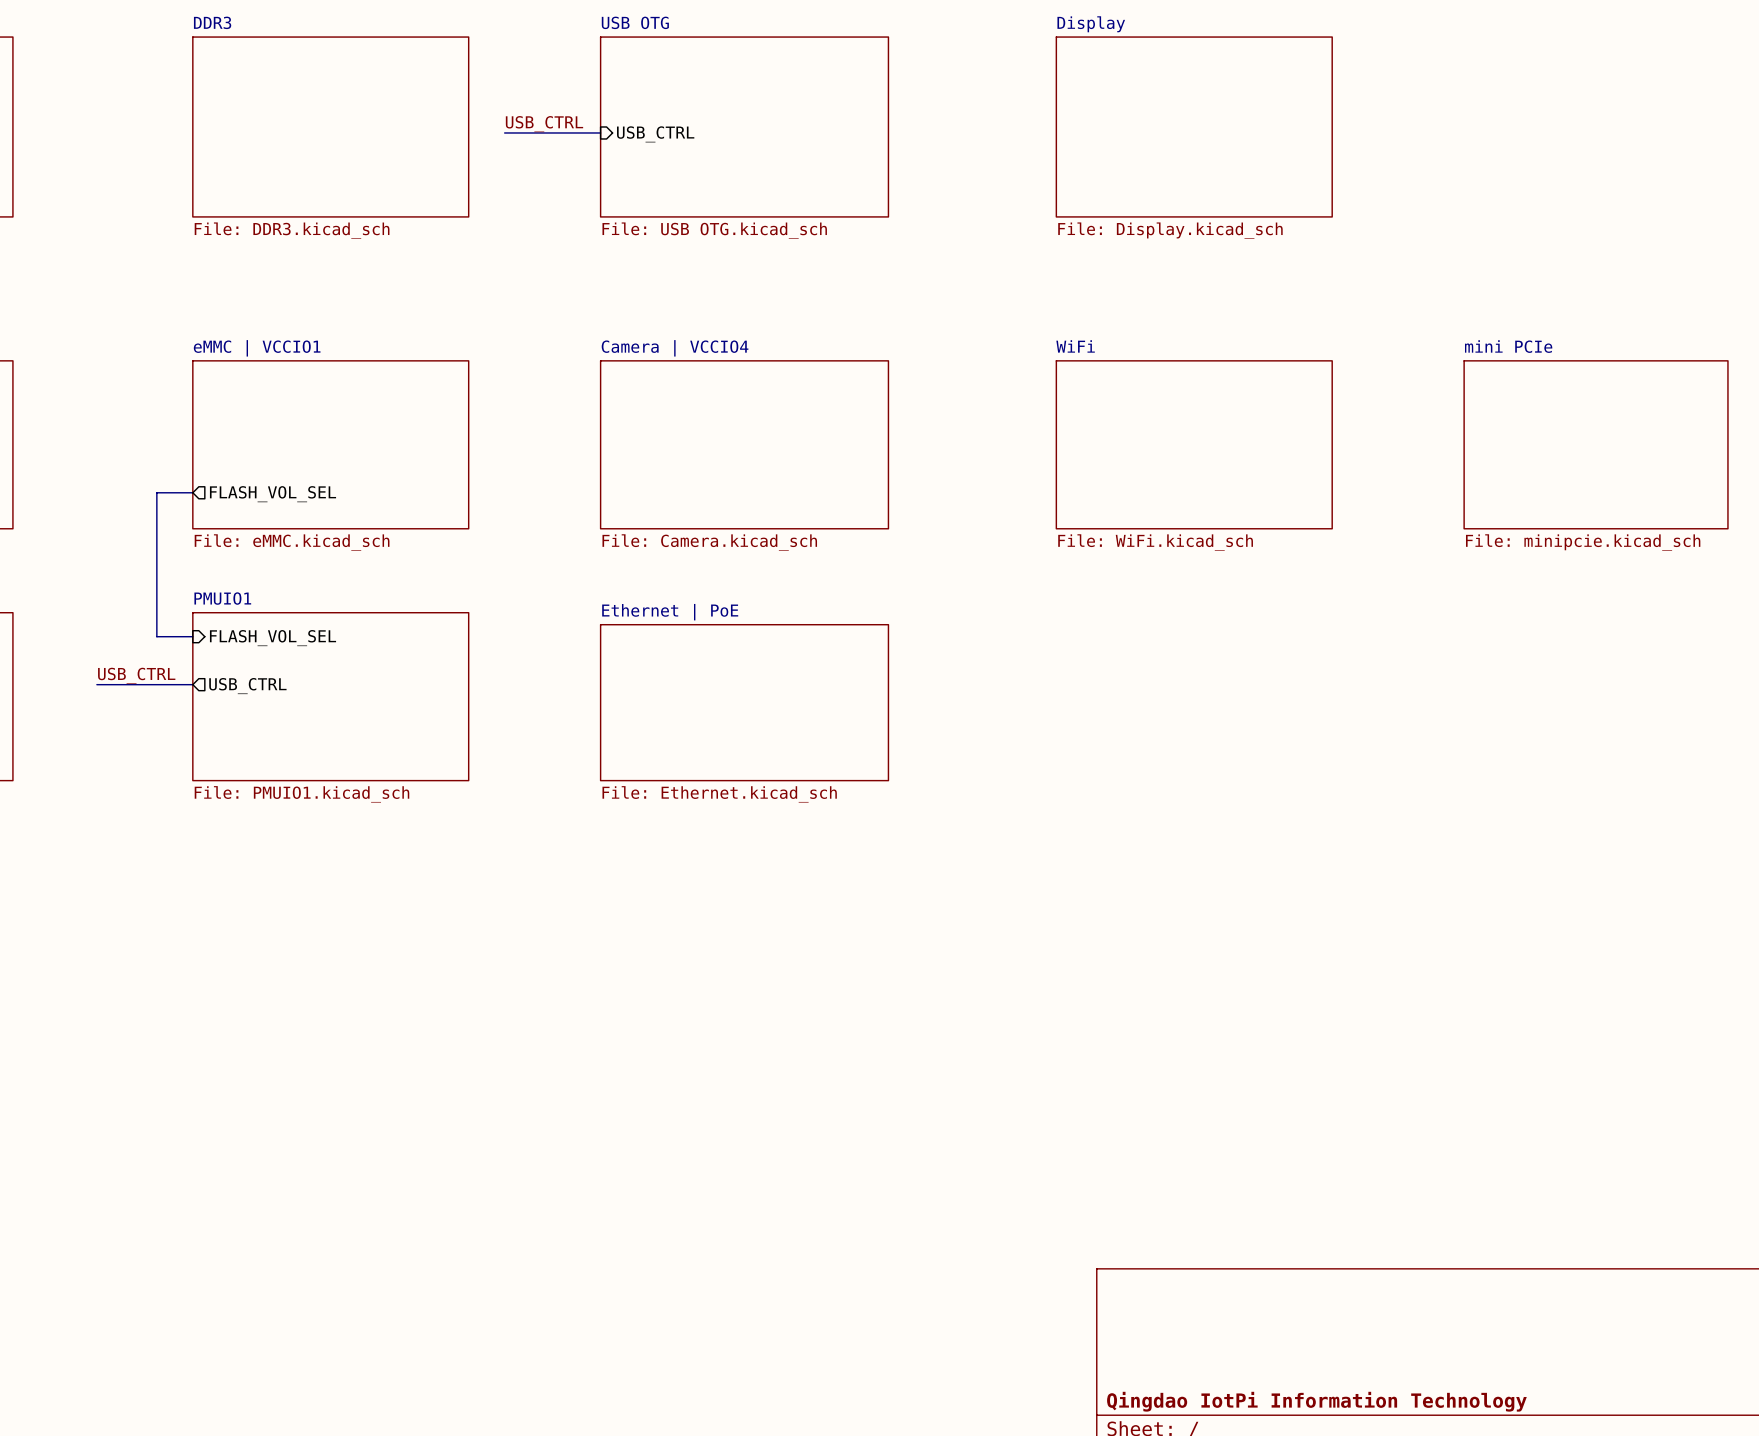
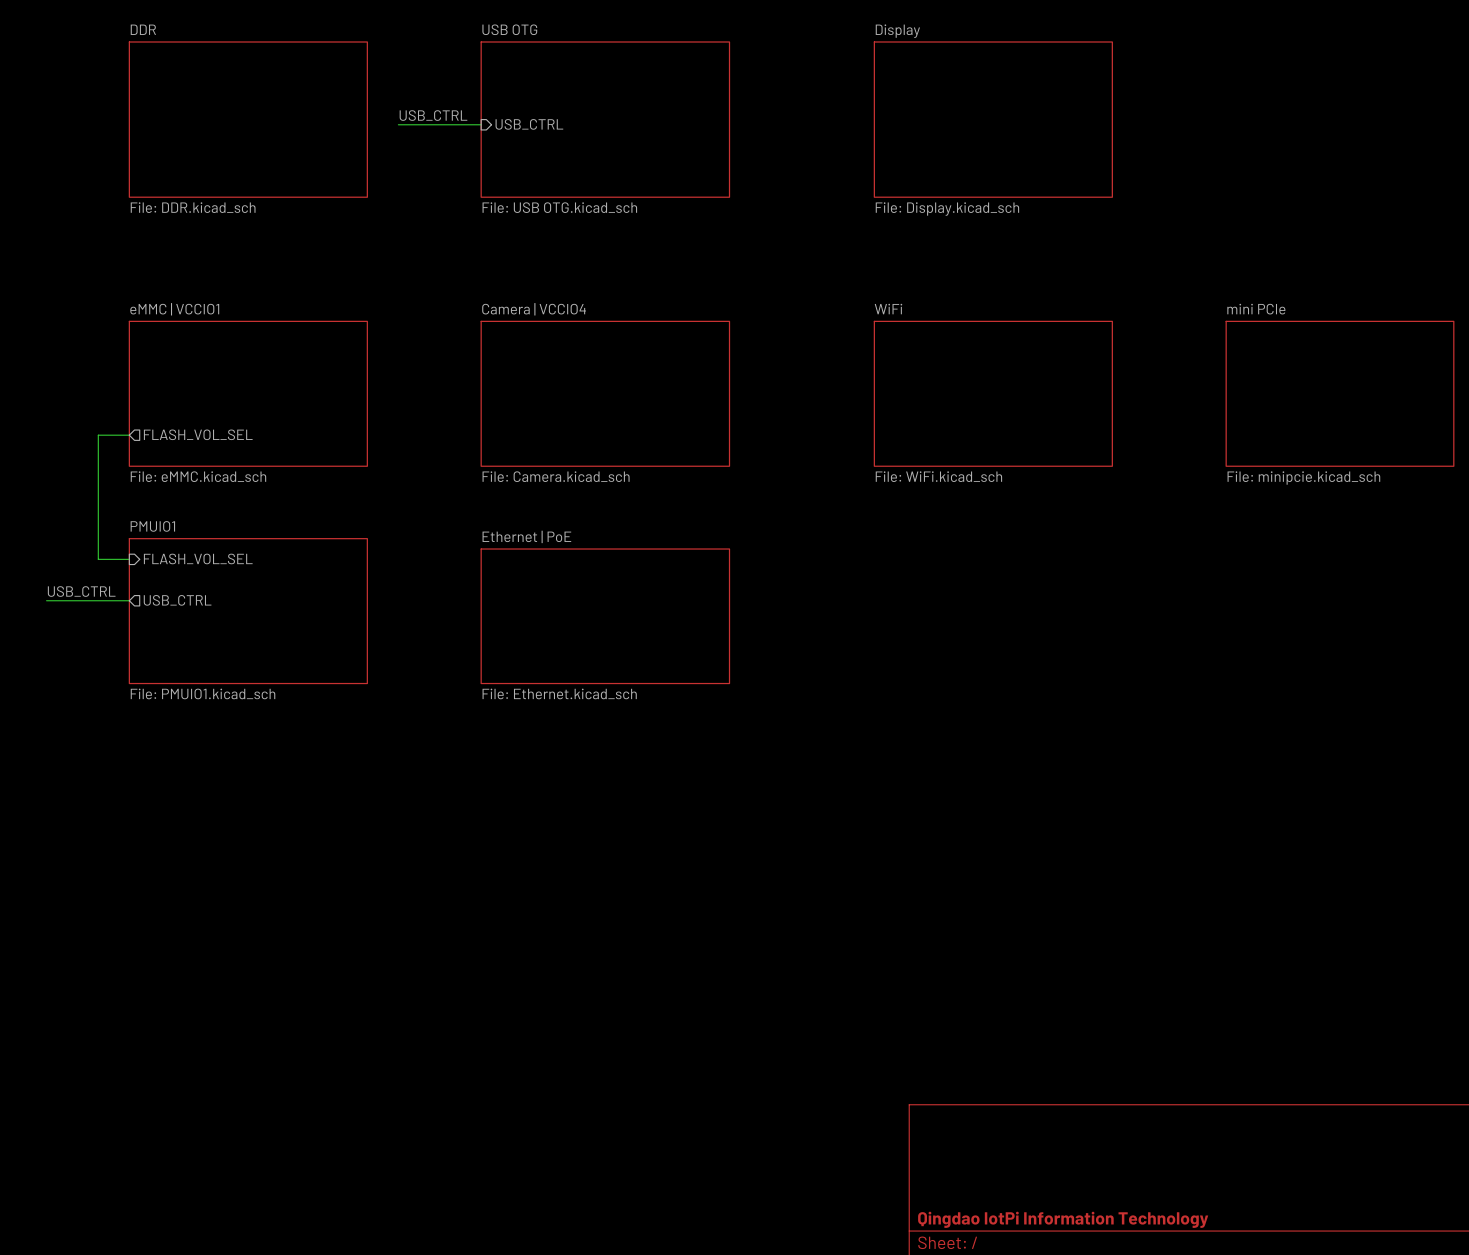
sheet DDR3 name: DDR3 (212, 22) -> DDR (143, 29)
sheet DDR3 value: File: DDR3.kicad_sch (292, 230) -> File: DDR.kicad_sch (193, 207)

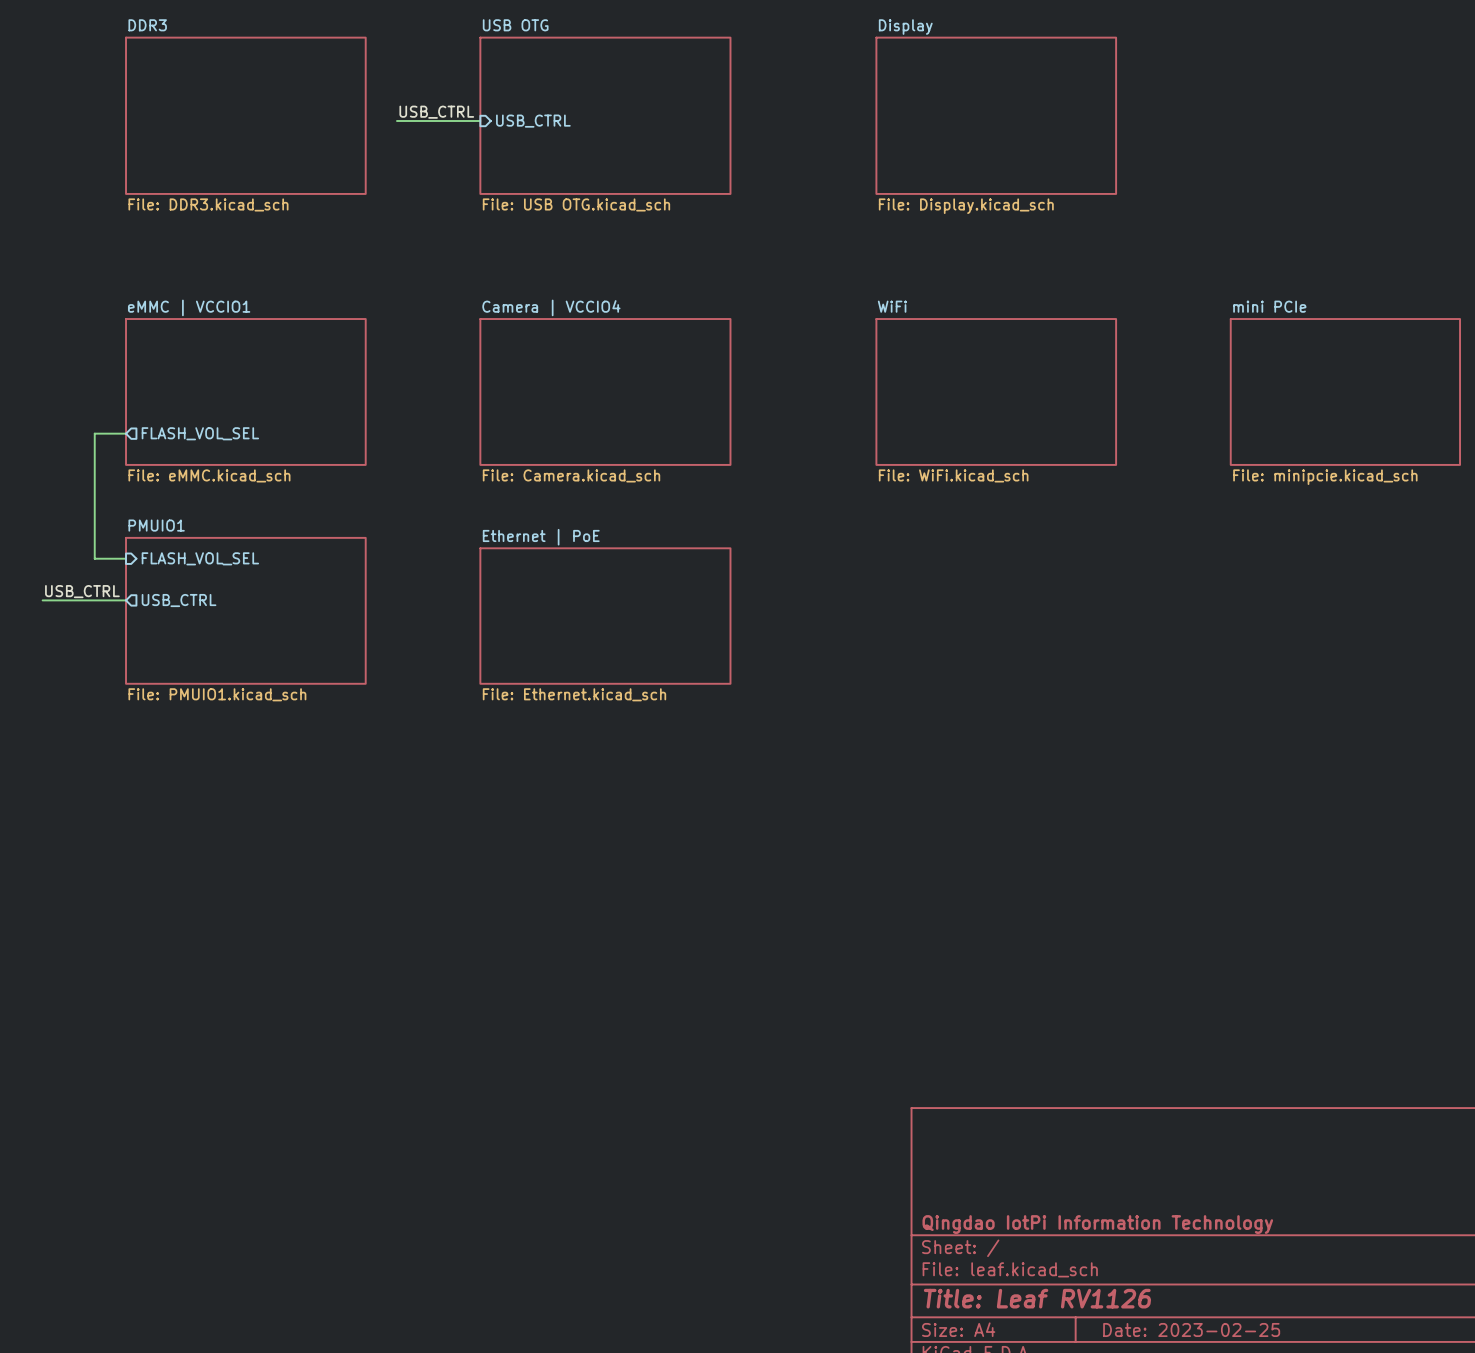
sheet DDR name: DDR (143, 29) -> DDR3 (147, 25)
sheet DDR value: File: DDR.kicad_sch (193, 207) -> File: DDR3.kicad_sch (208, 204)

